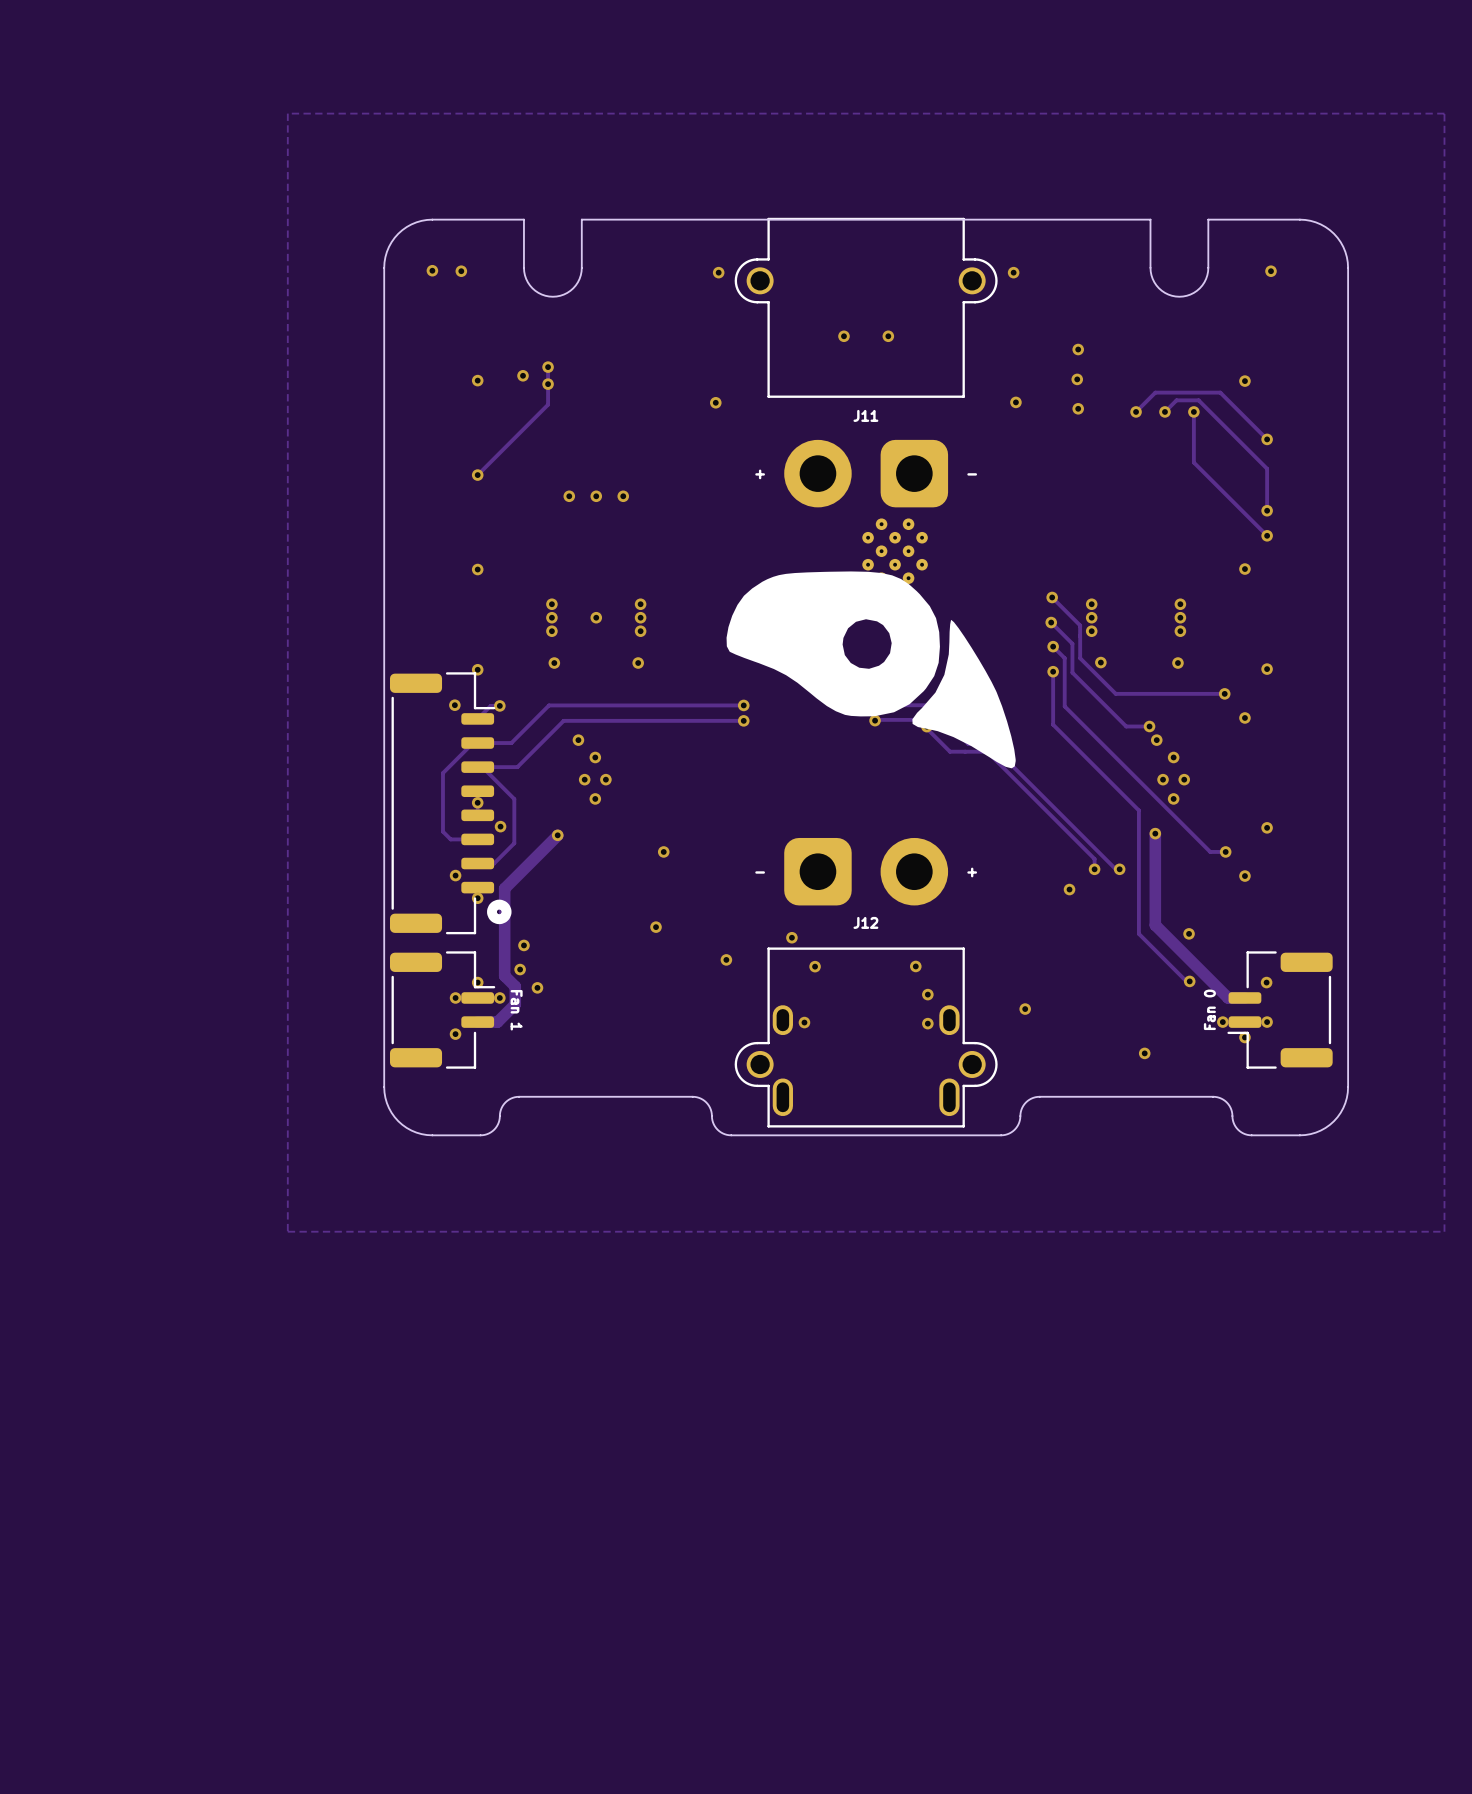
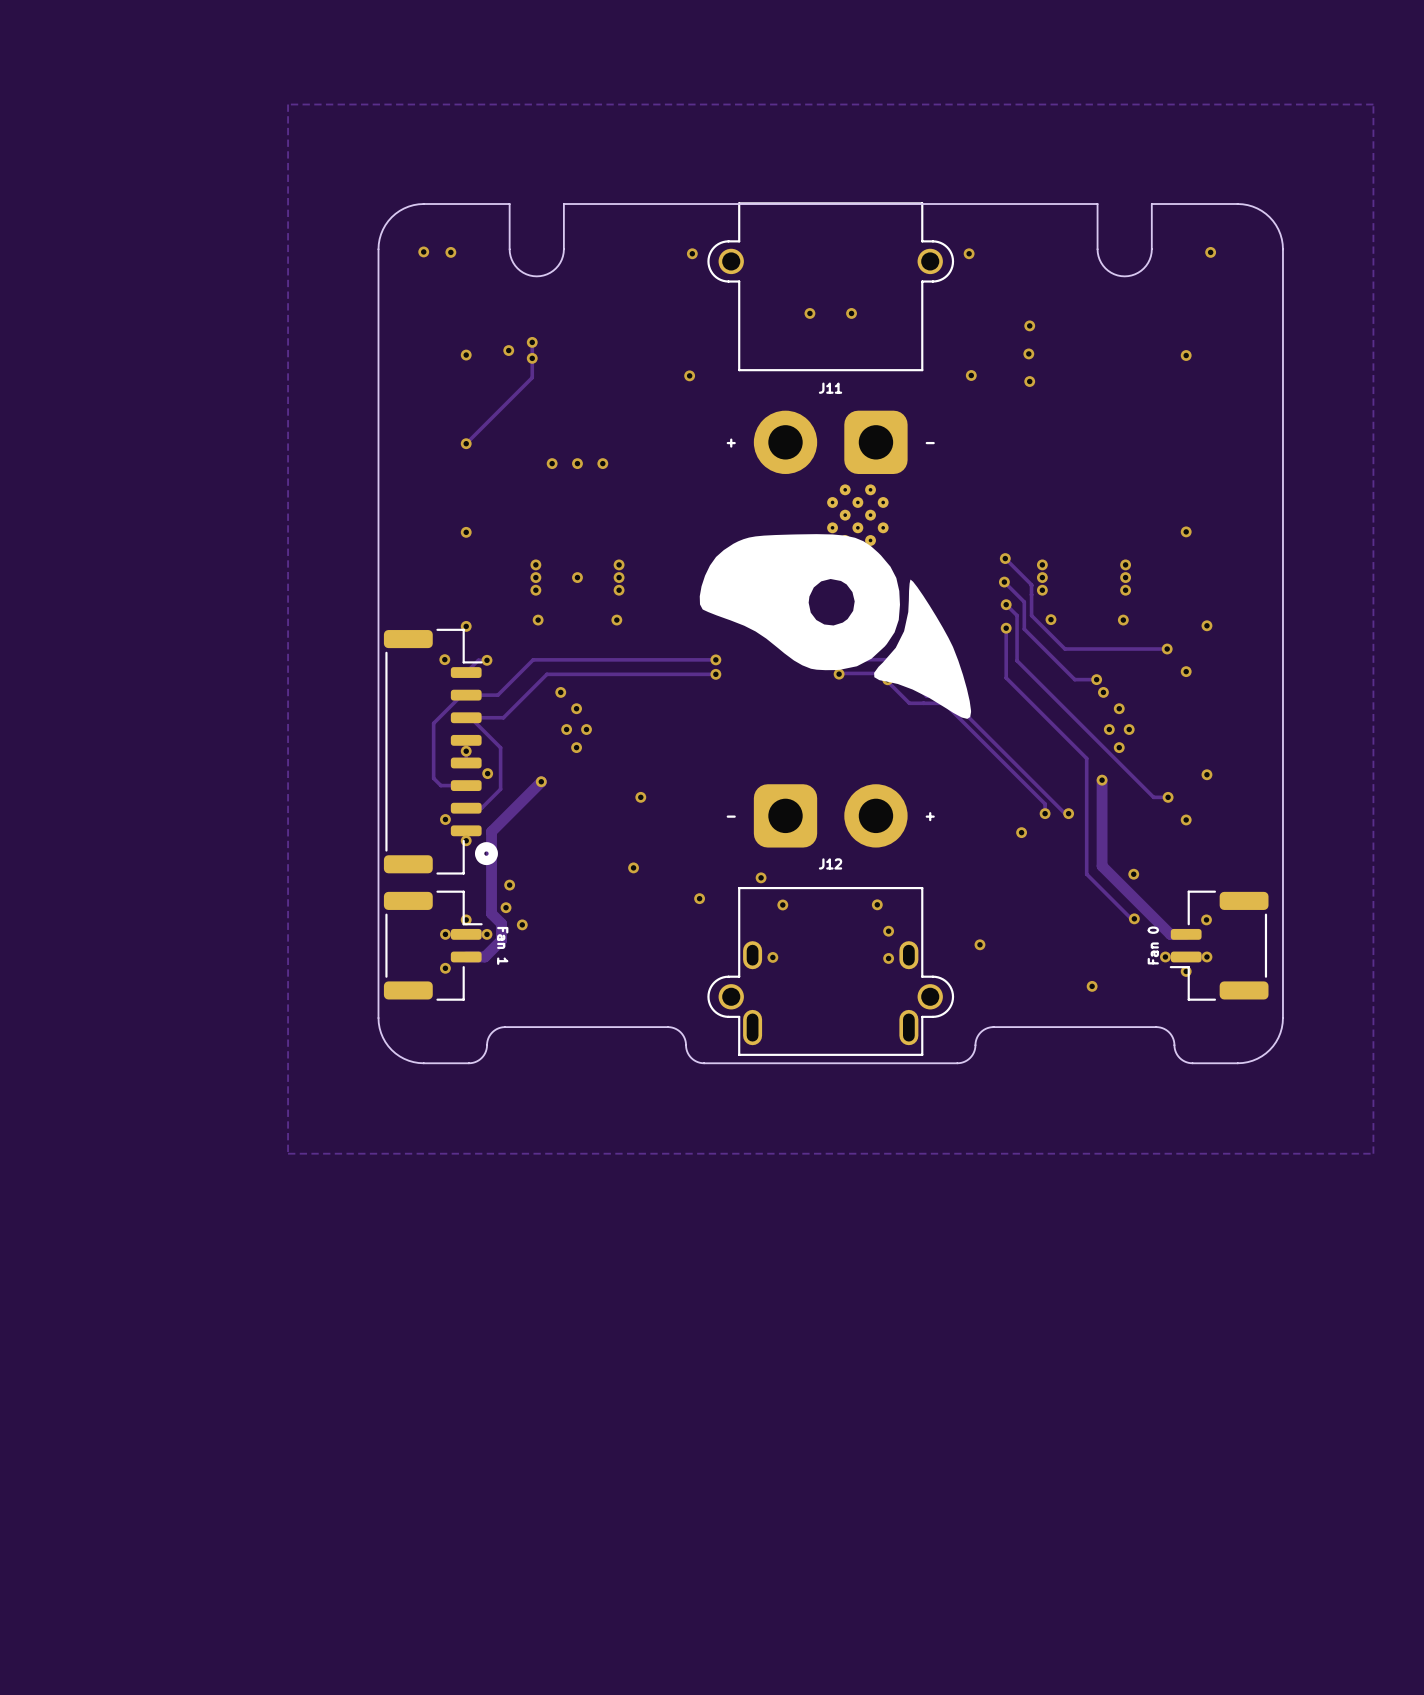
track: (1136, 411) (1155, 392) (1220, 392) (1267, 439) -> none
via: (1136, 411) -> none
track: (1164, 411) (1176, 400) (1198, 400) (1267, 468) (1267, 510) -> none
via: (1164, 411) -> none
track: (1193, 411) (1193, 462) (1267, 535) -> none
via: (1193, 411) -> none
via: (1267, 439) -> none
via: (1267, 510) -> none
via: (1267, 535) -> none

